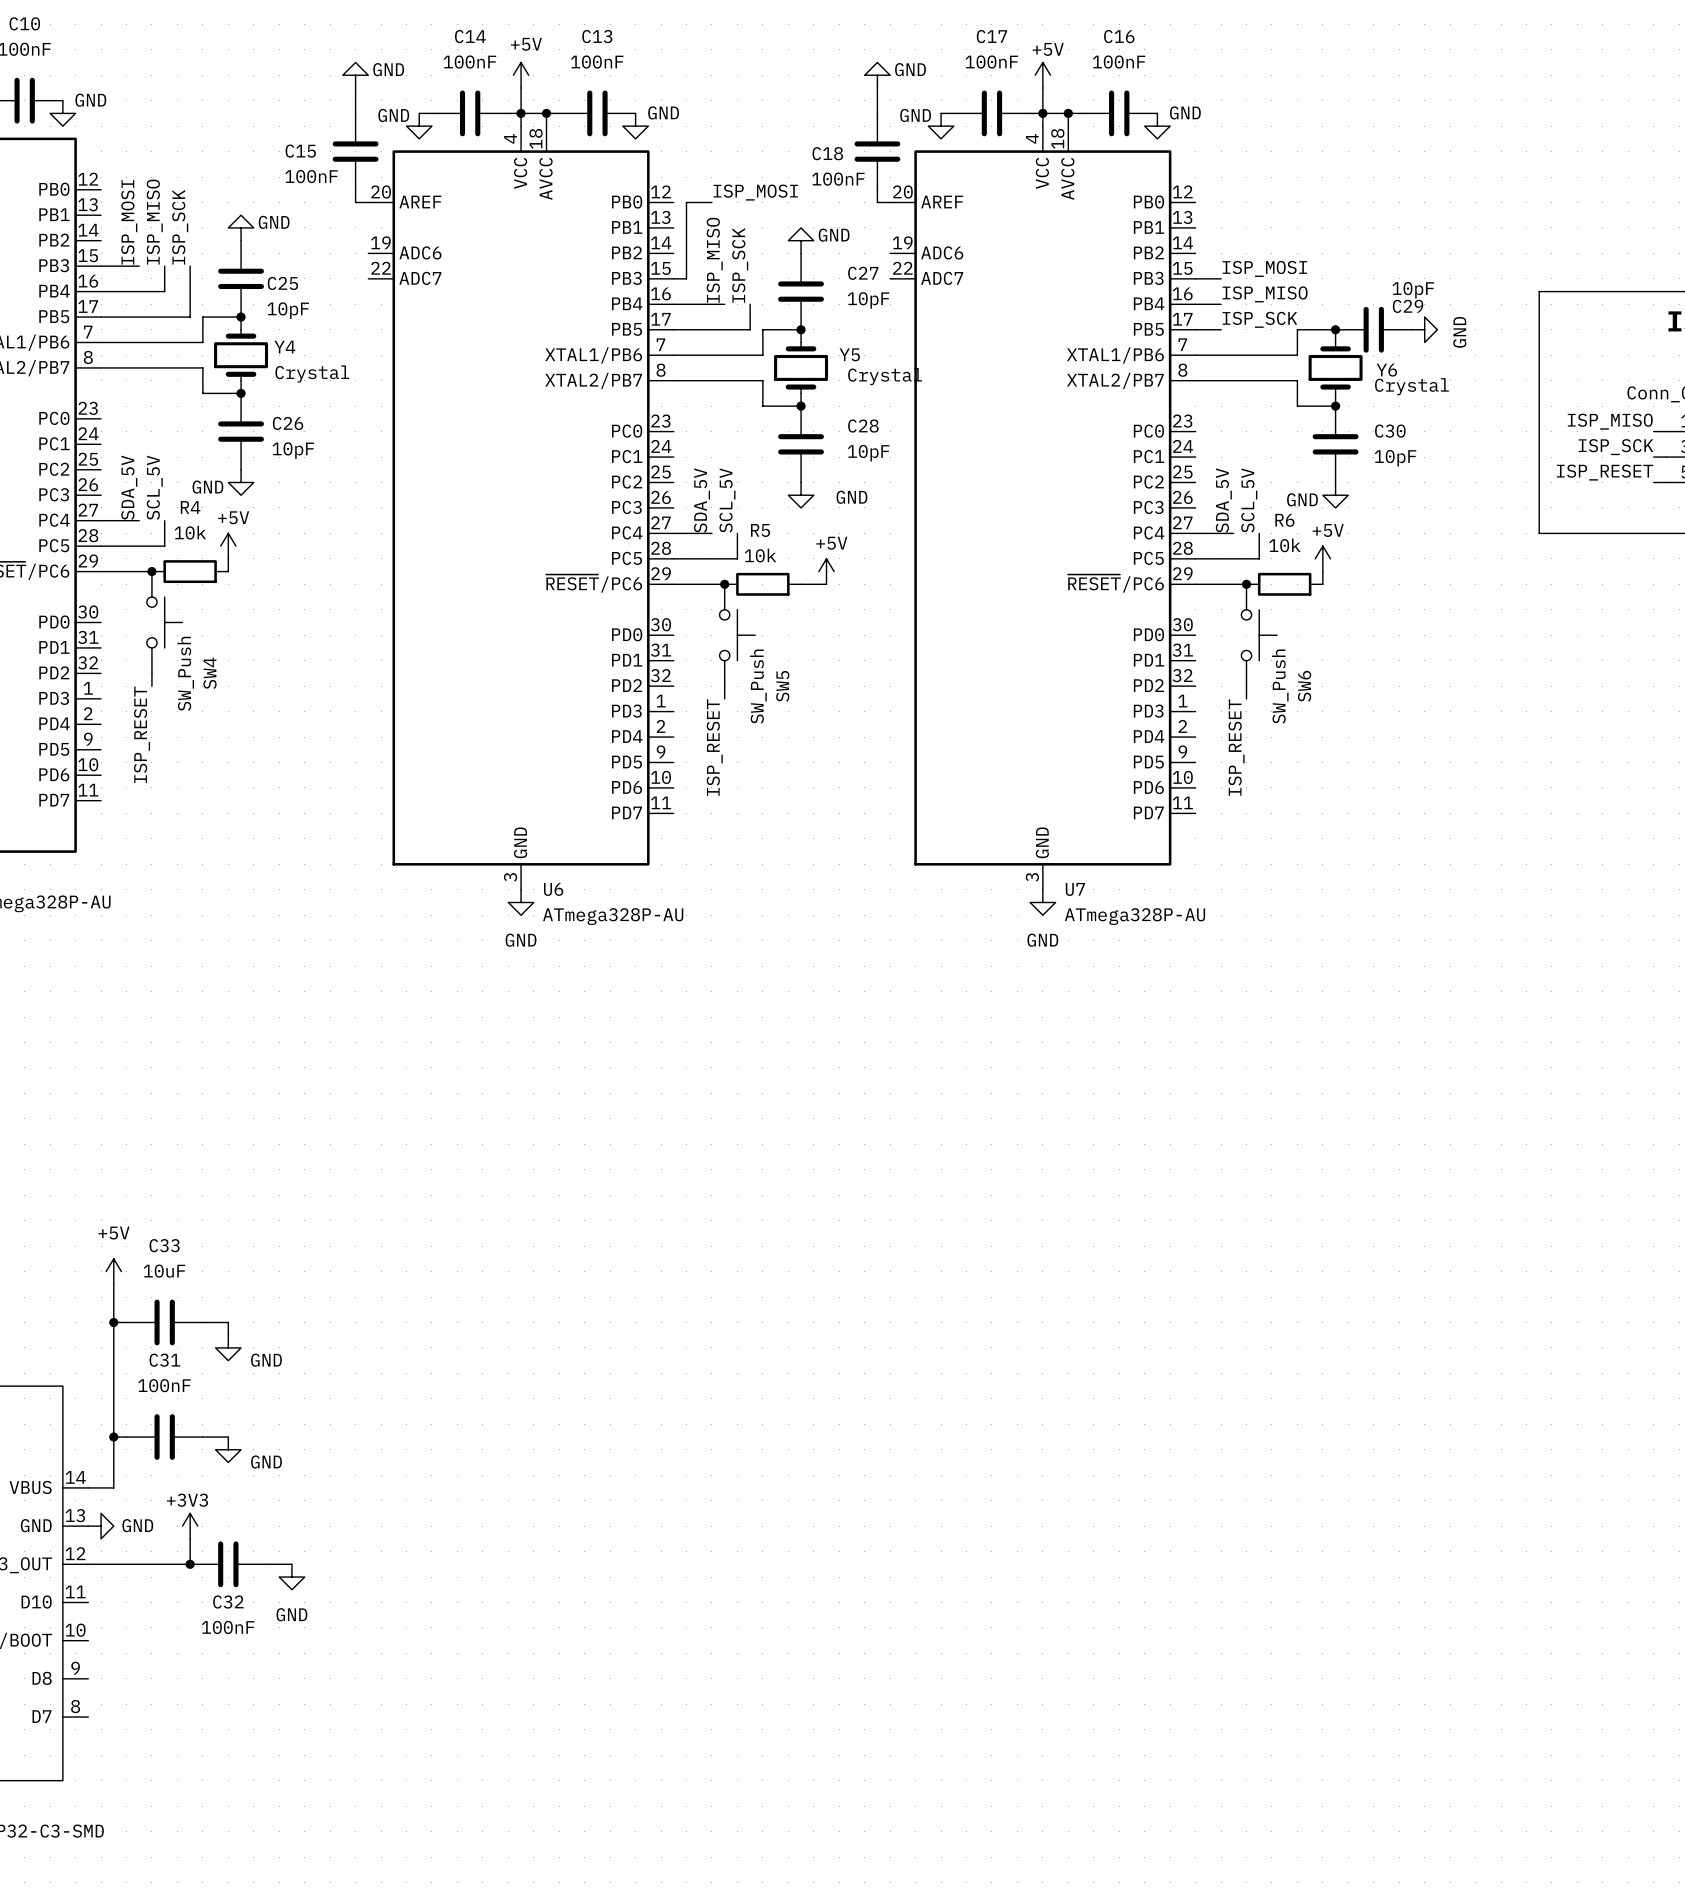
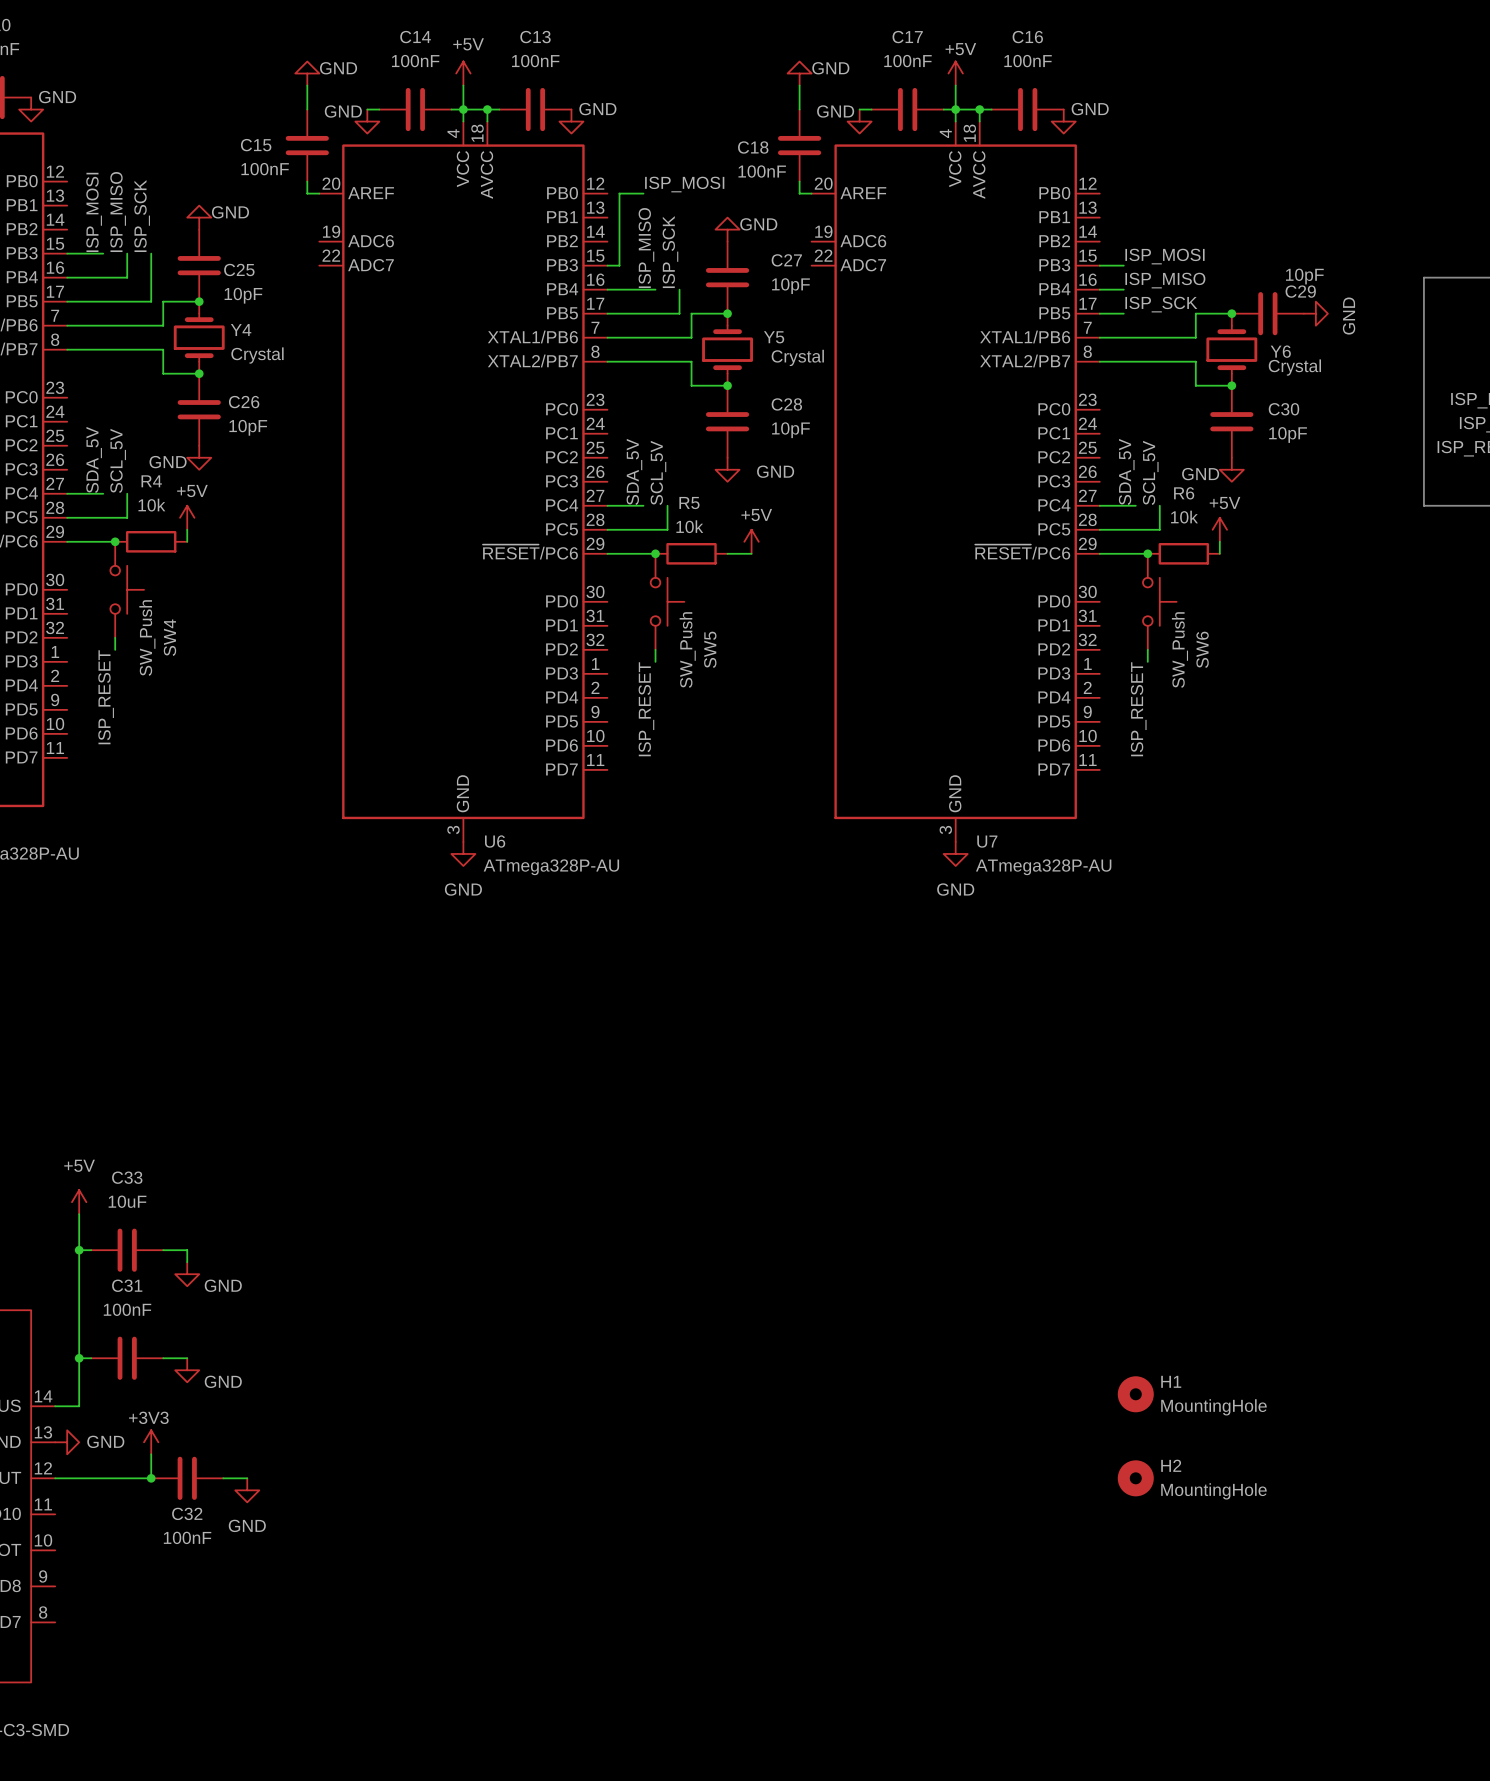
H1: none -> MountingHole (1135, 1394)
H2: none -> MountingHole (1135, 1478)

